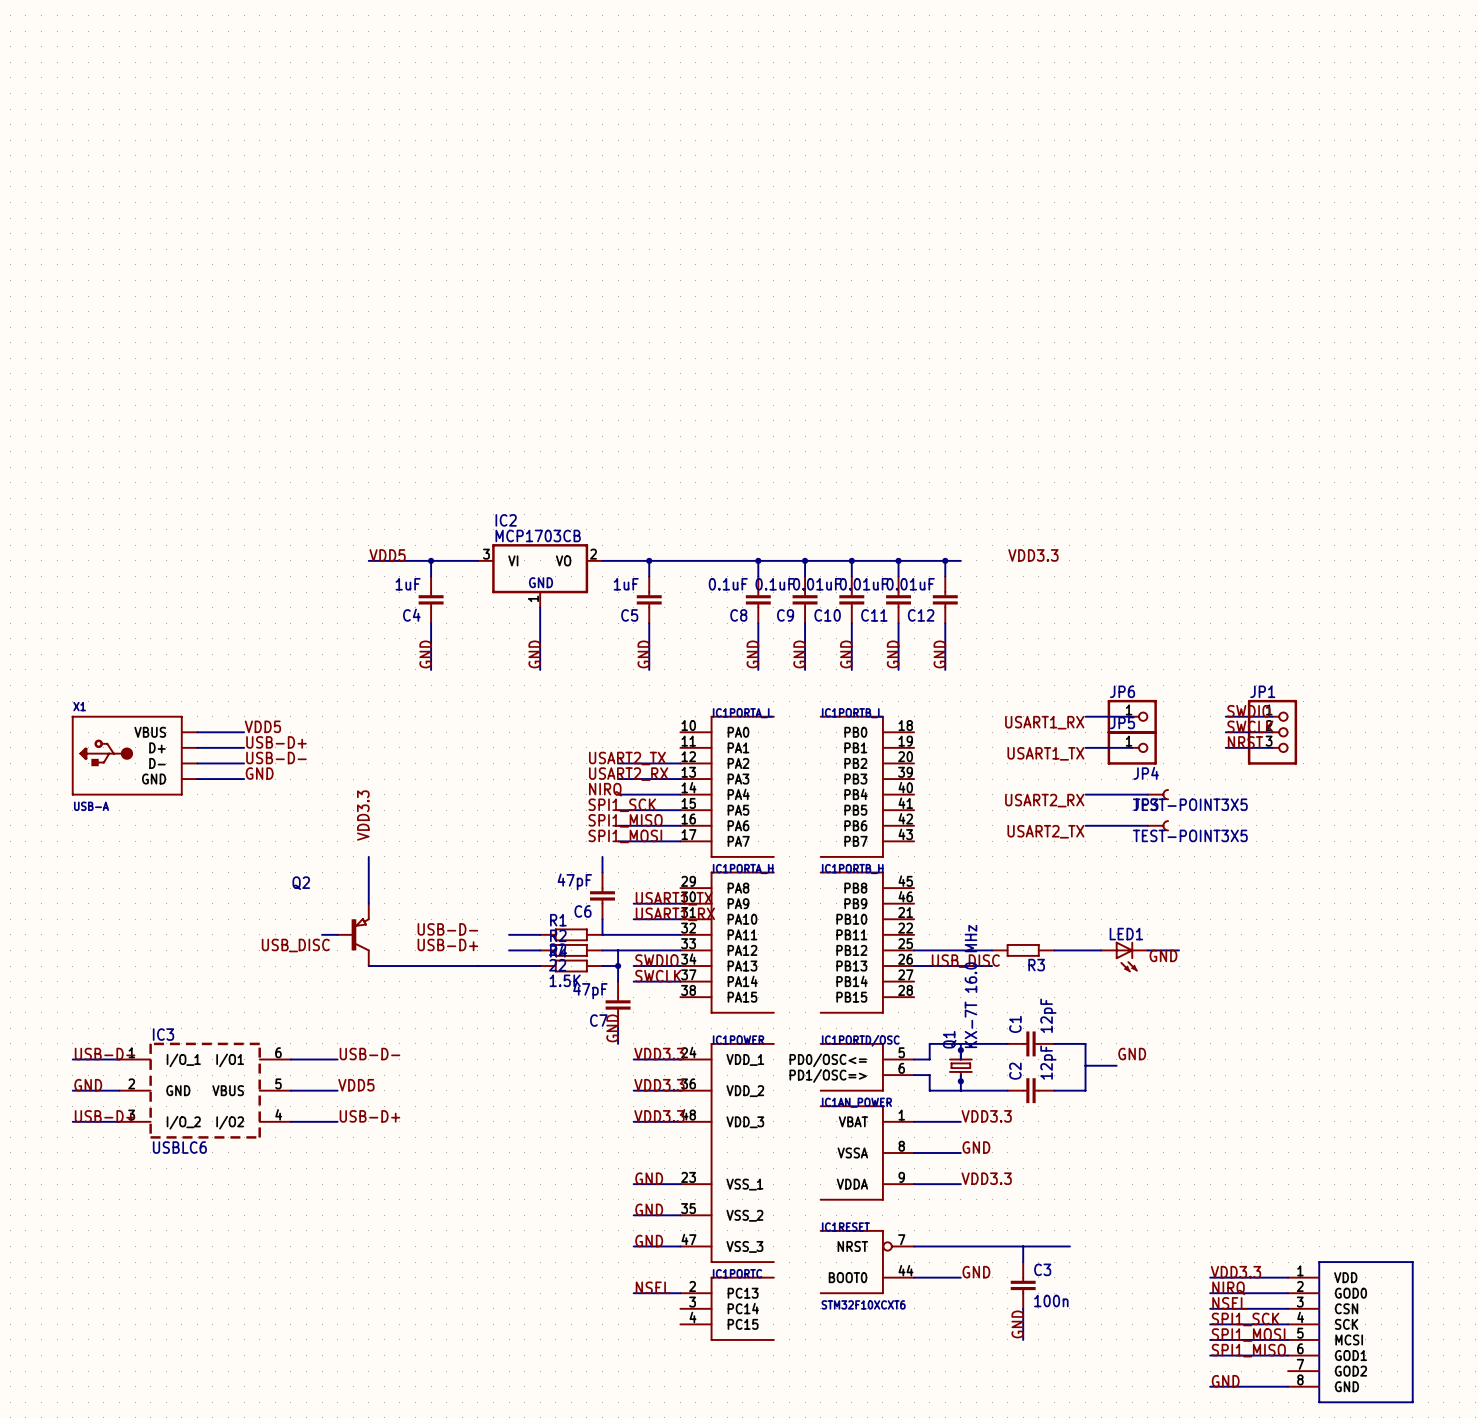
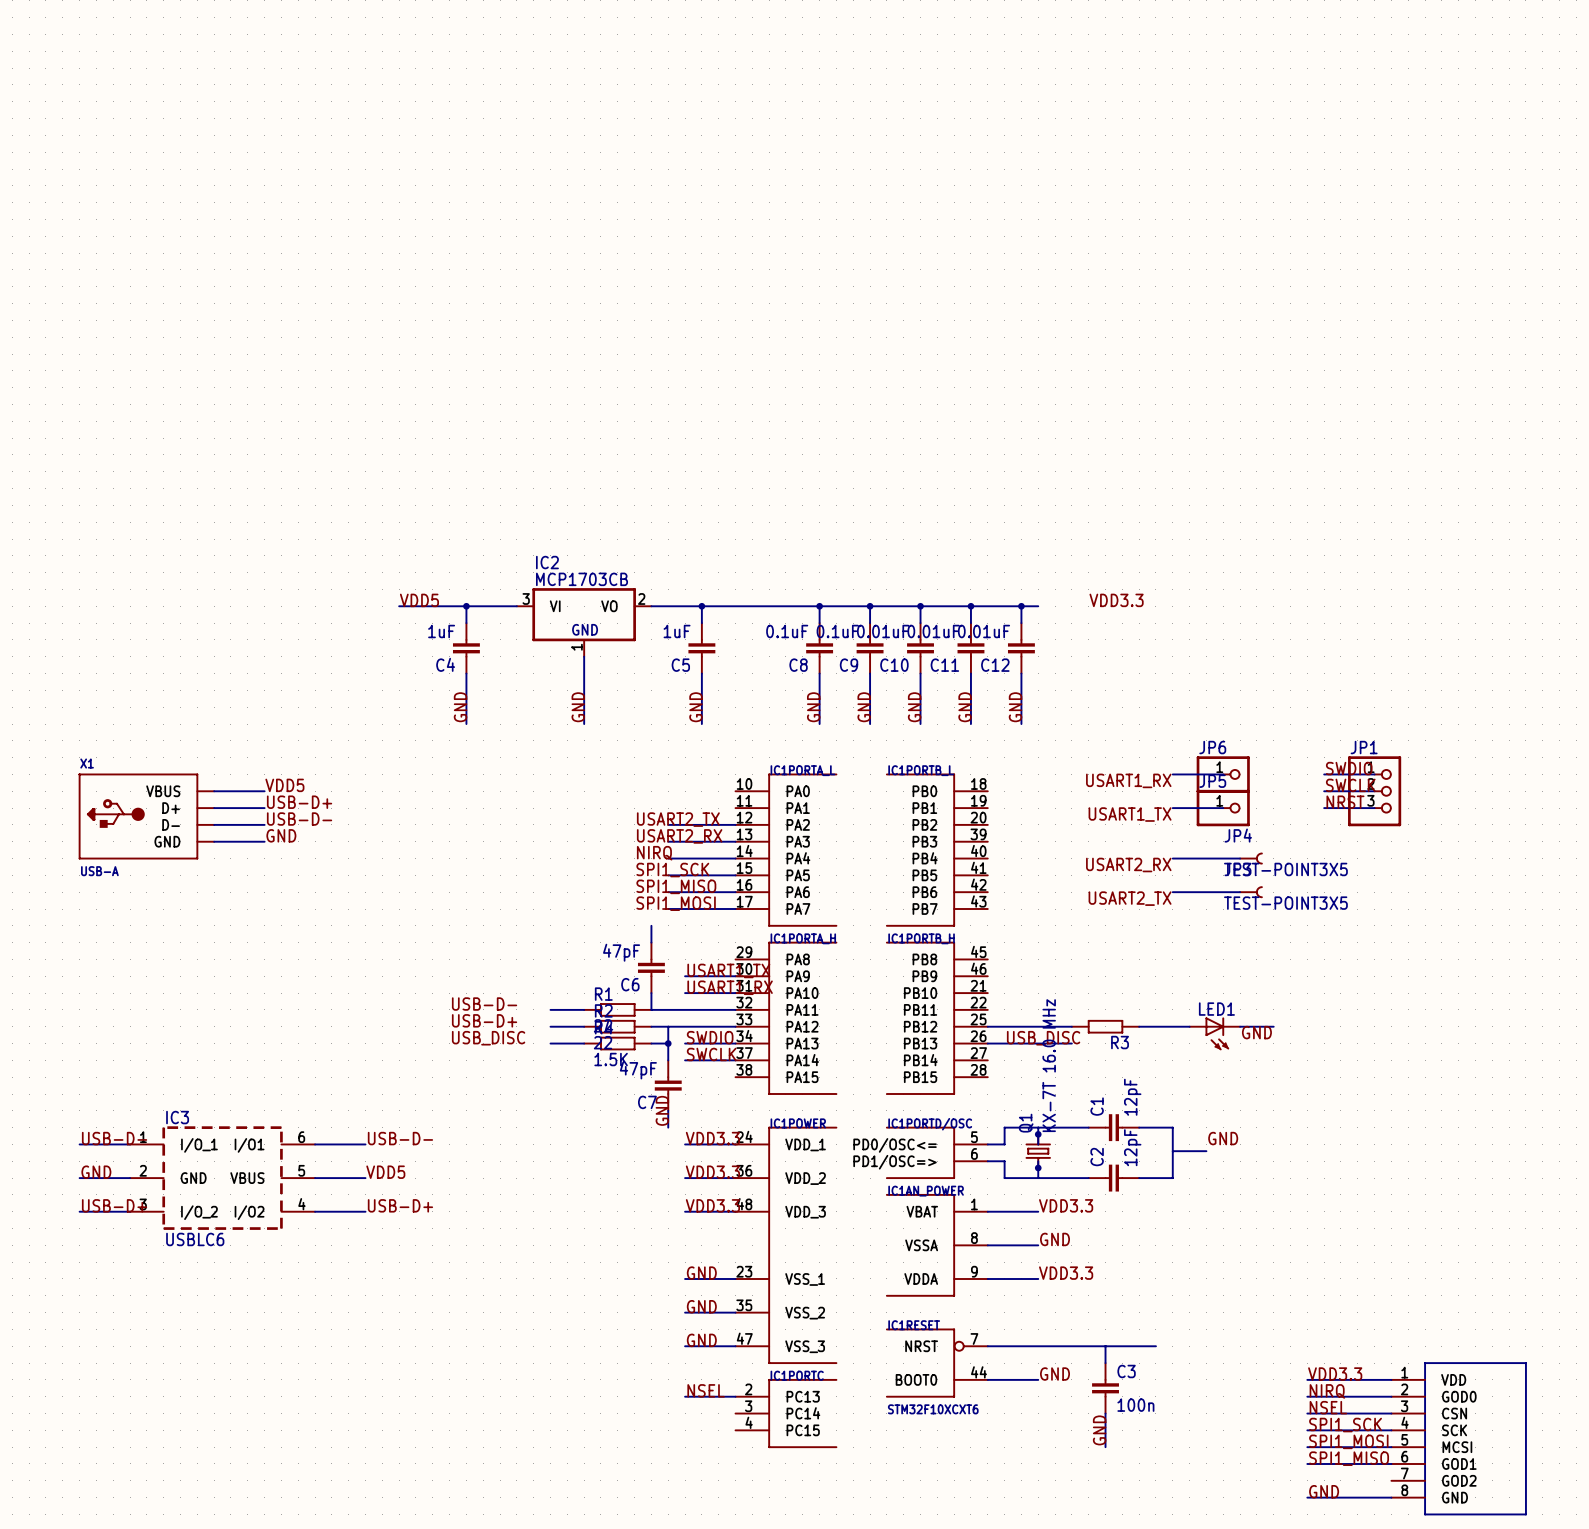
label: VDD3.3 (363, 815) -> none
wire: (368, 856) (368, 903) -> none
wire: (322, 934) (337, 934) -> none
Q2: (353, 934) -> none
label: USB_DISC (295, 945) -> none
label: none -> USB_DISC (488, 1038)
wire: (368, 966) (509, 966) -> none

